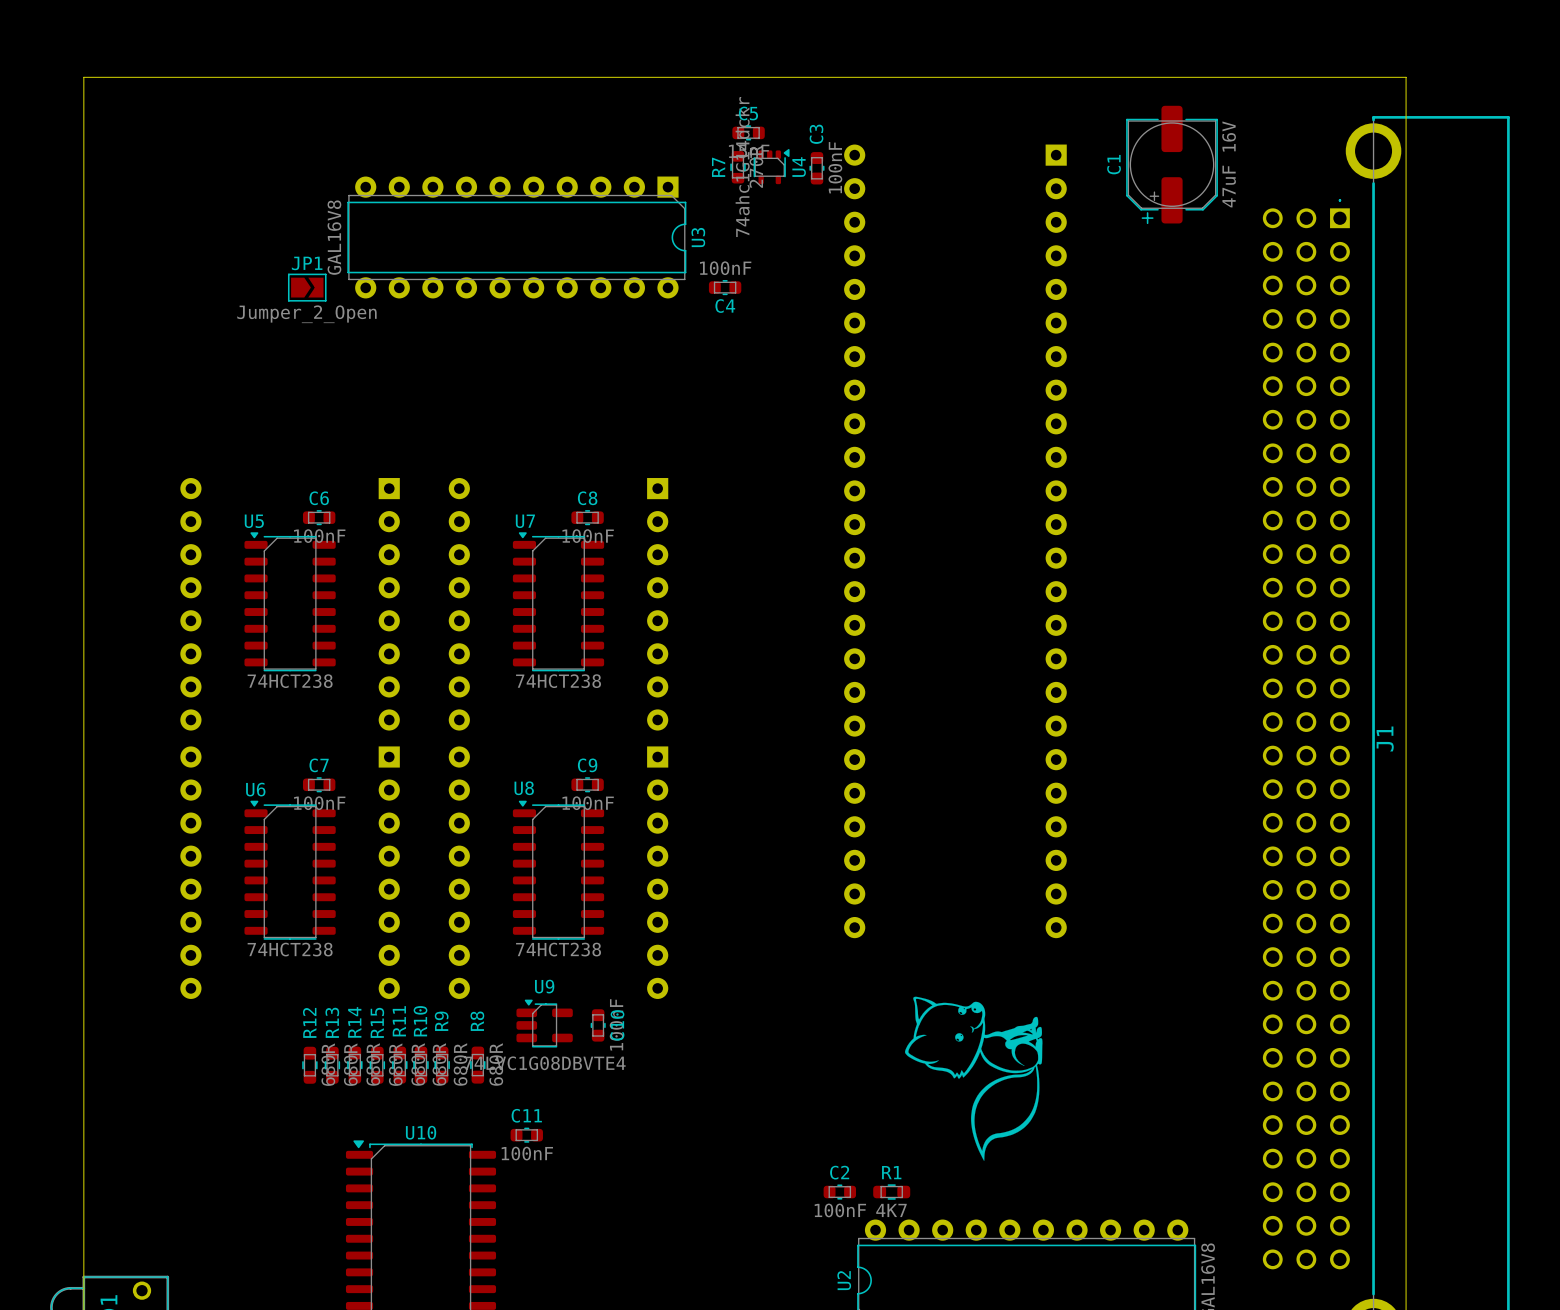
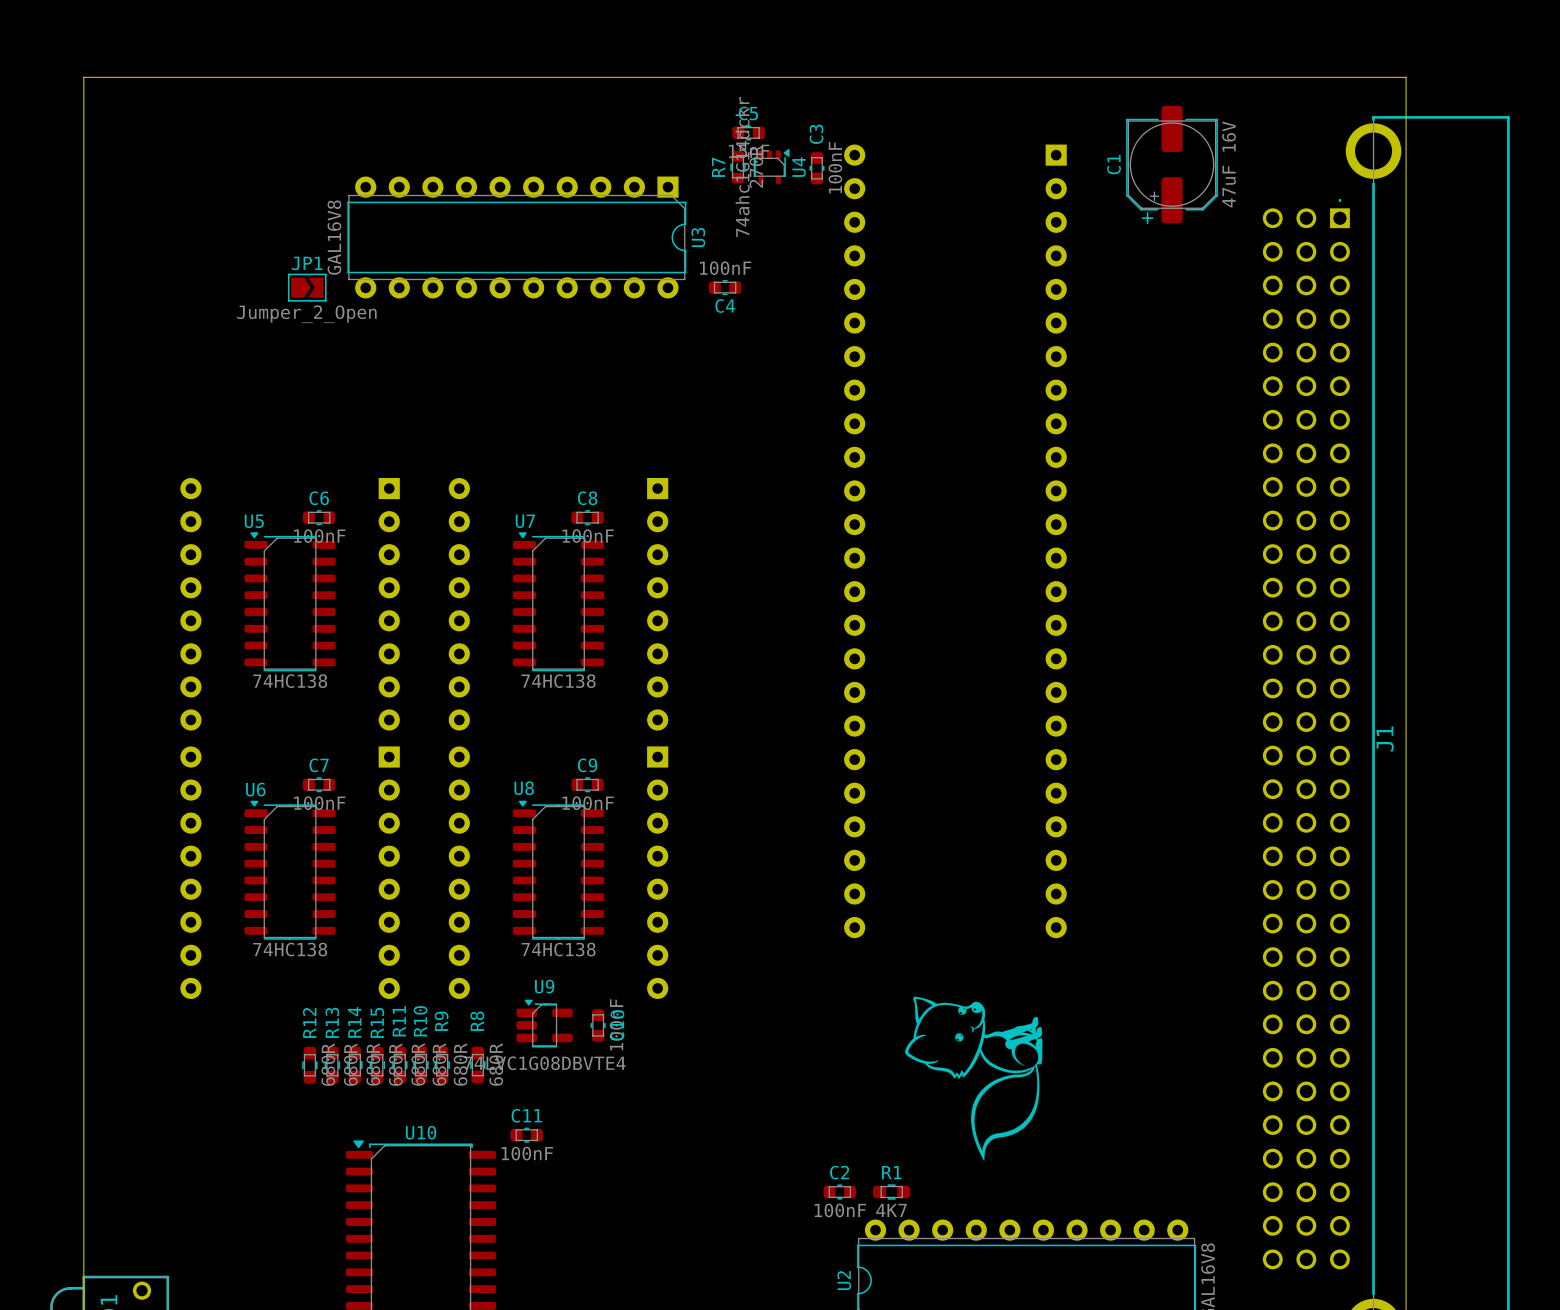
U5 value: 74HCT238 (290, 681) -> 74HC138 (290, 681)
U7 value: 74HCT238 (558, 681) -> 74HC138 (558, 681)
U6 value: 74HCT238 (290, 949) -> 74HC138 (290, 949)
U8 value: 74HCT238 (558, 949) -> 74HC138 (558, 949)

